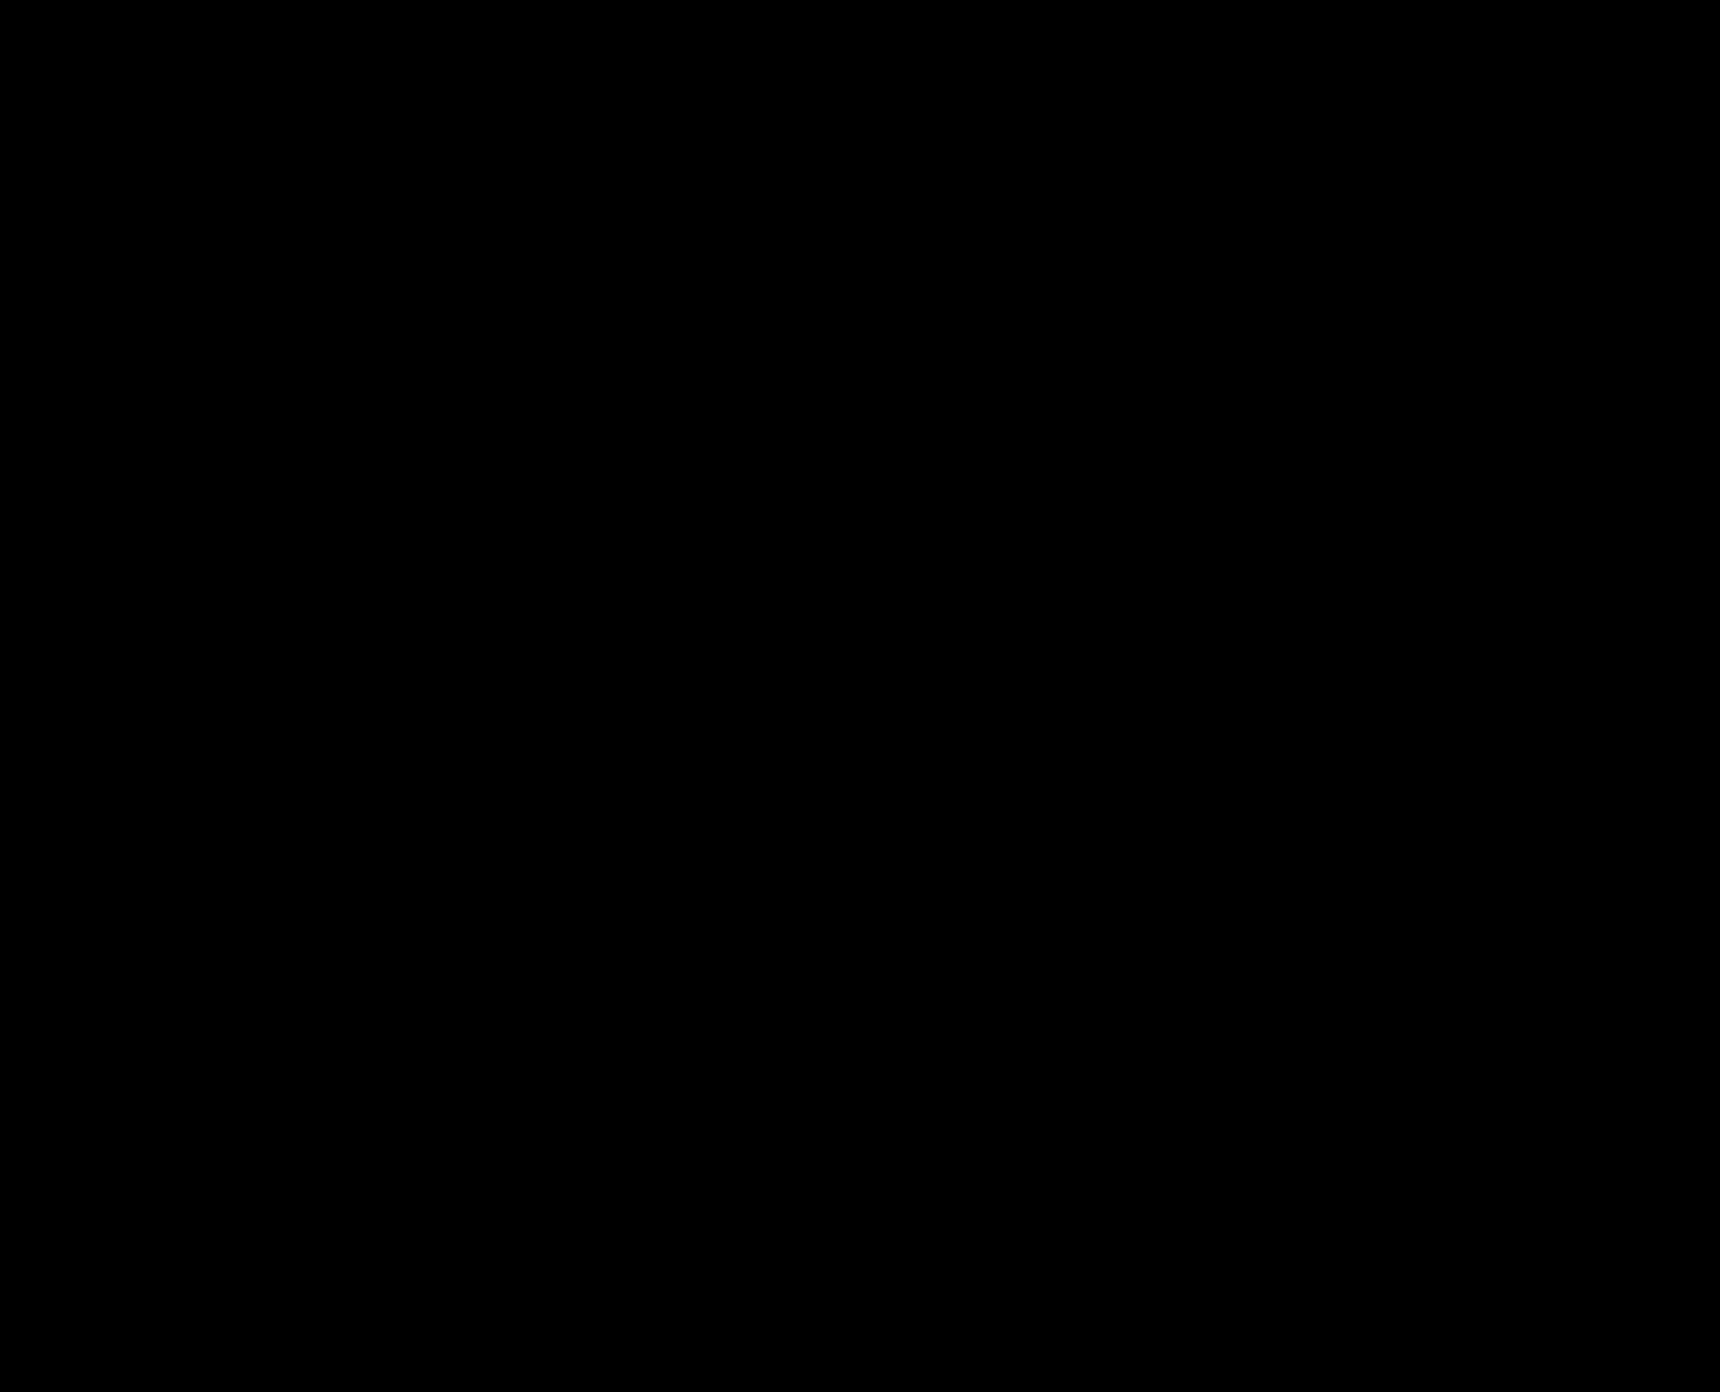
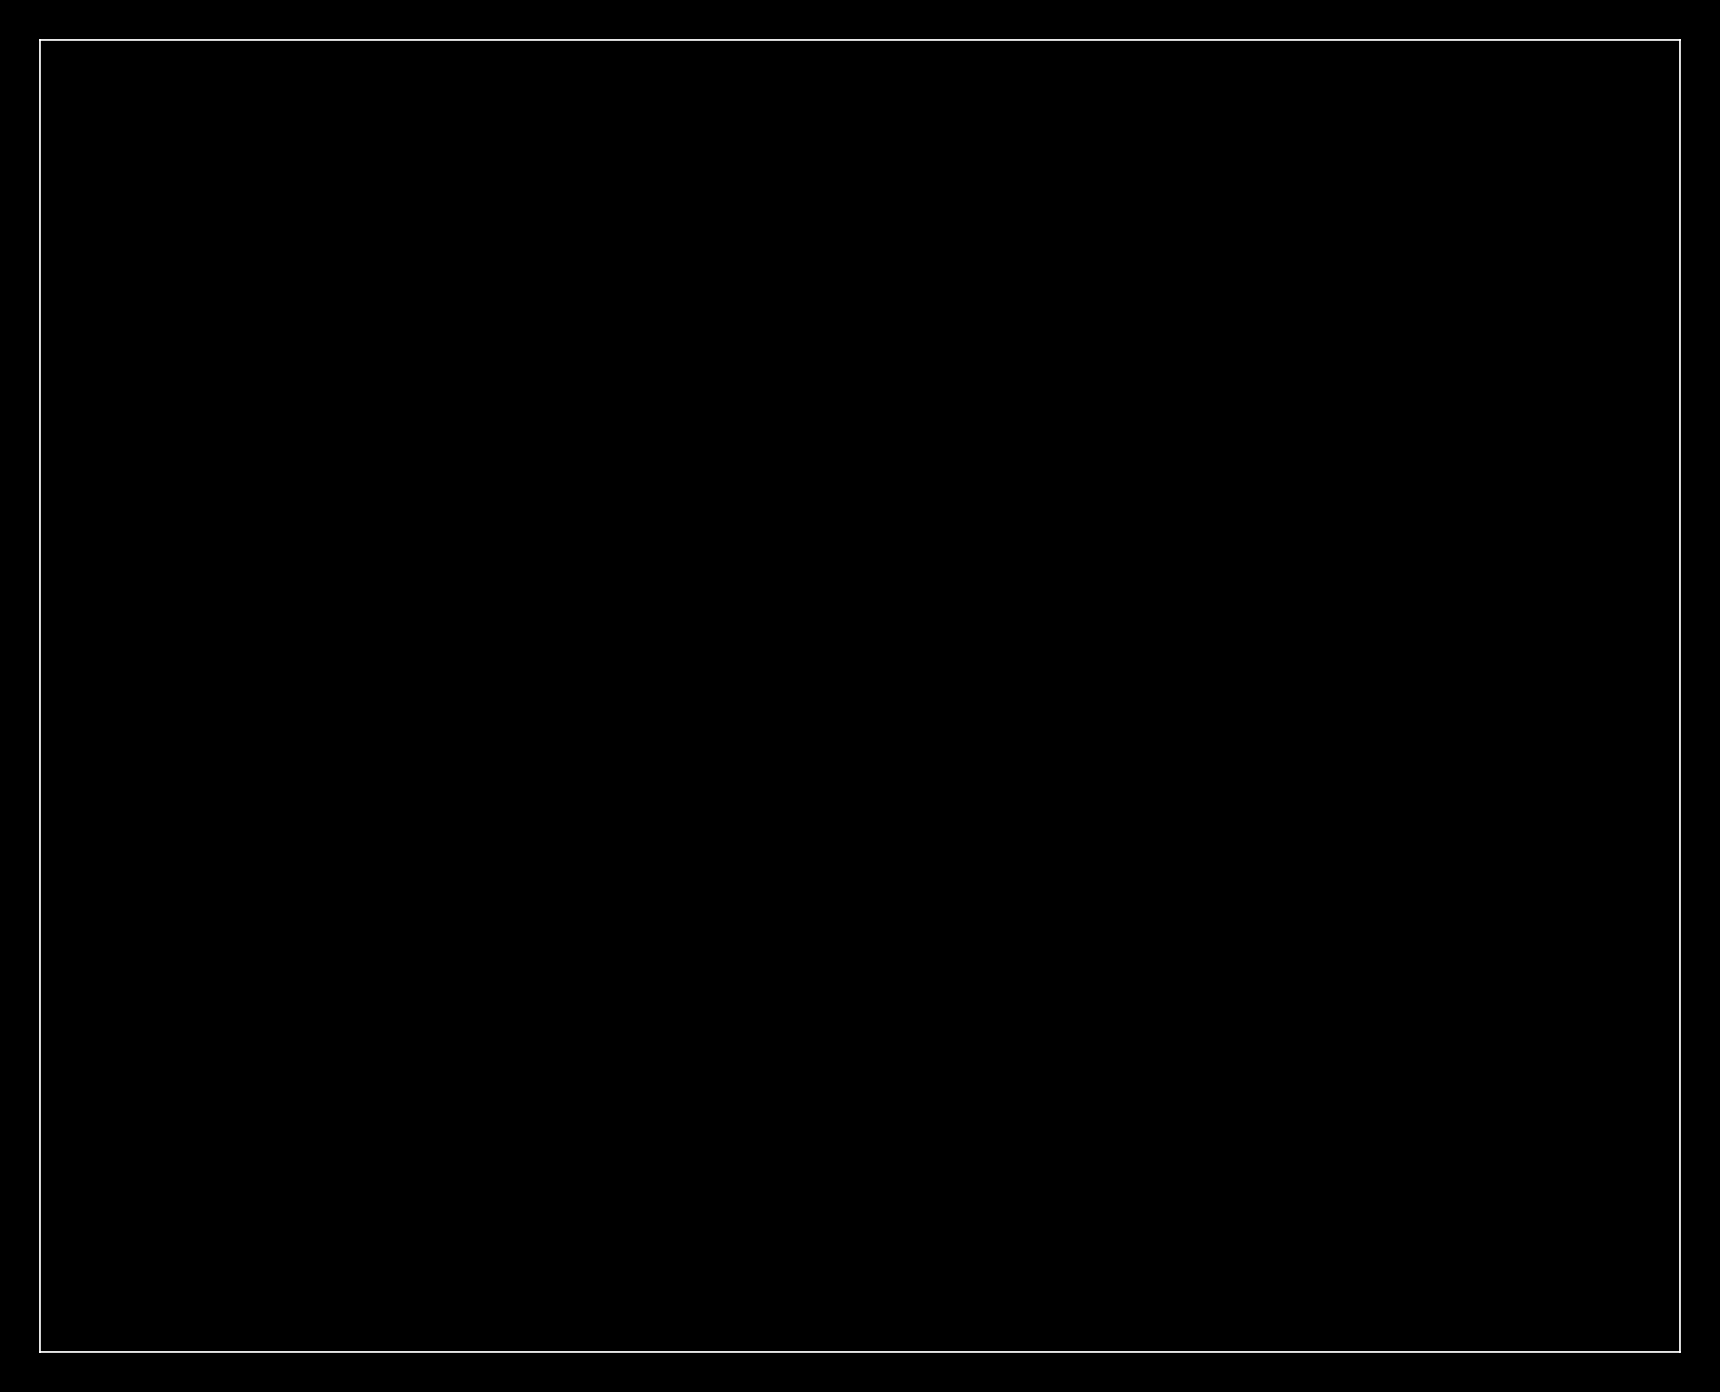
board edge: none -> (39, 39) (1679, 39) (1679, 1351) (39, 1351) (39, 39)

